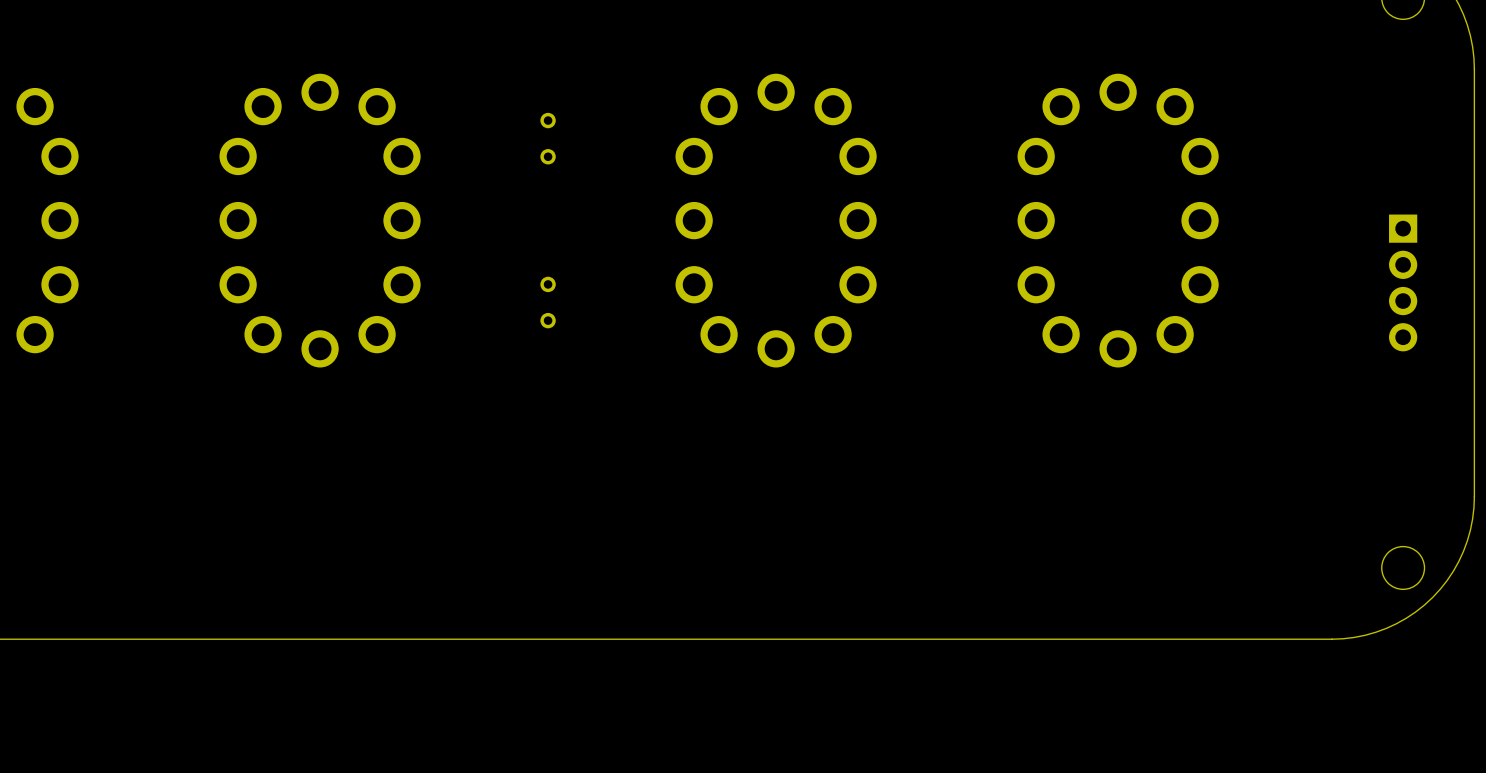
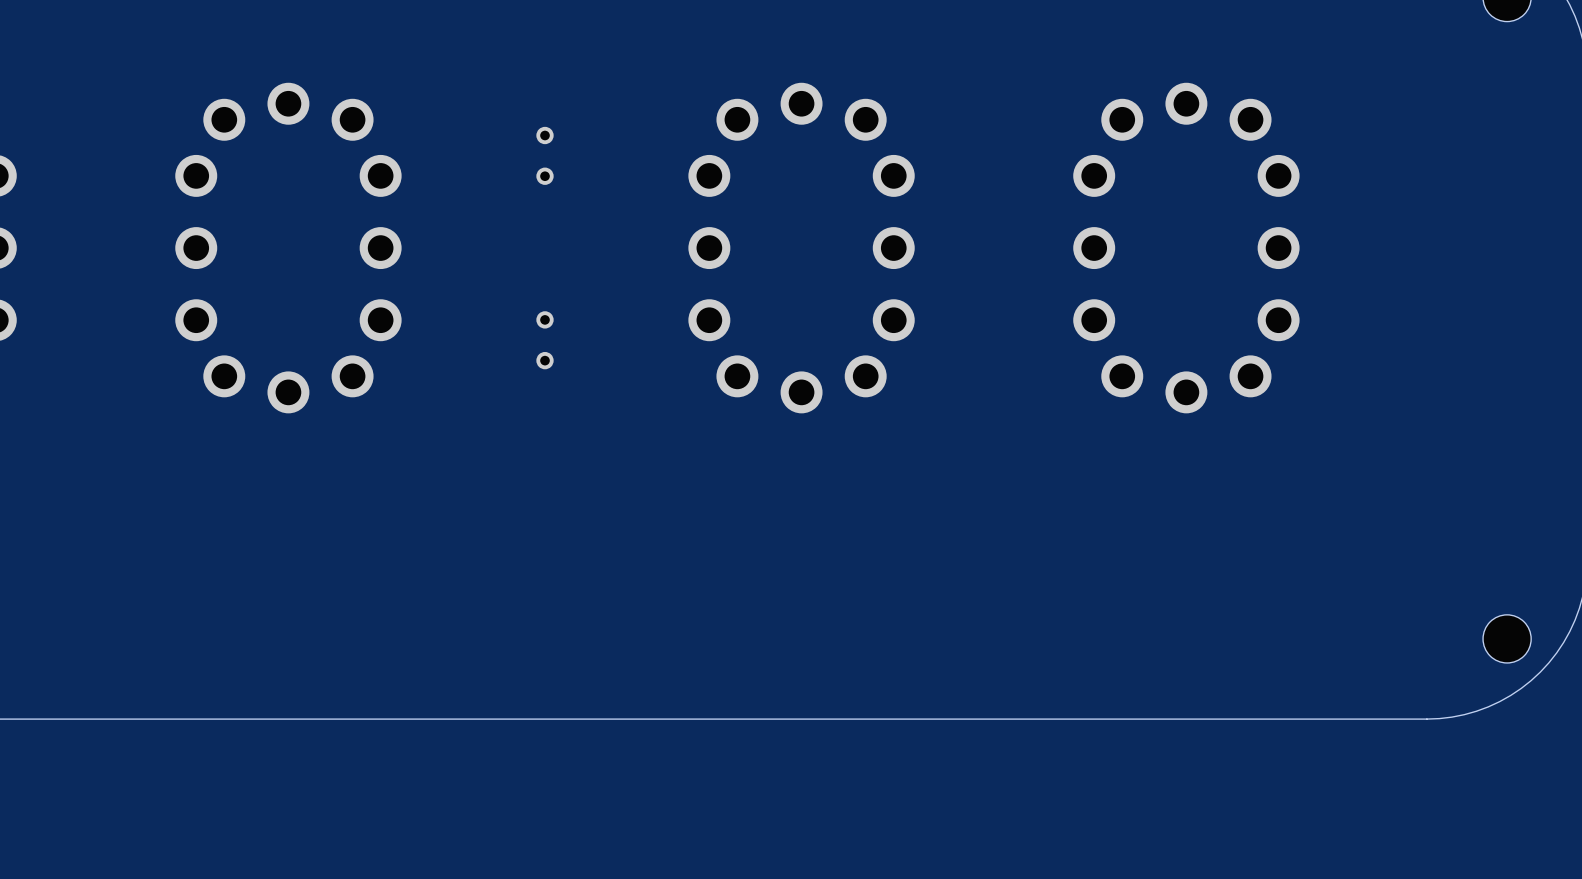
part: (1403, 282) -> none

